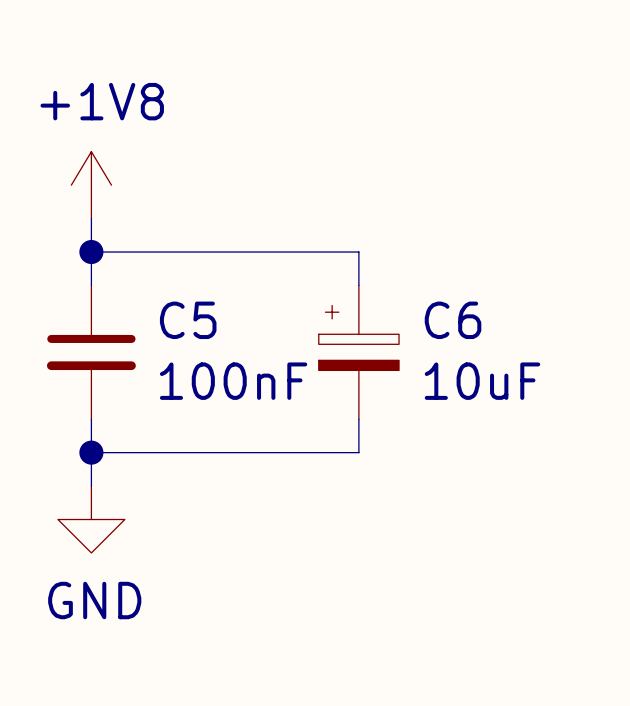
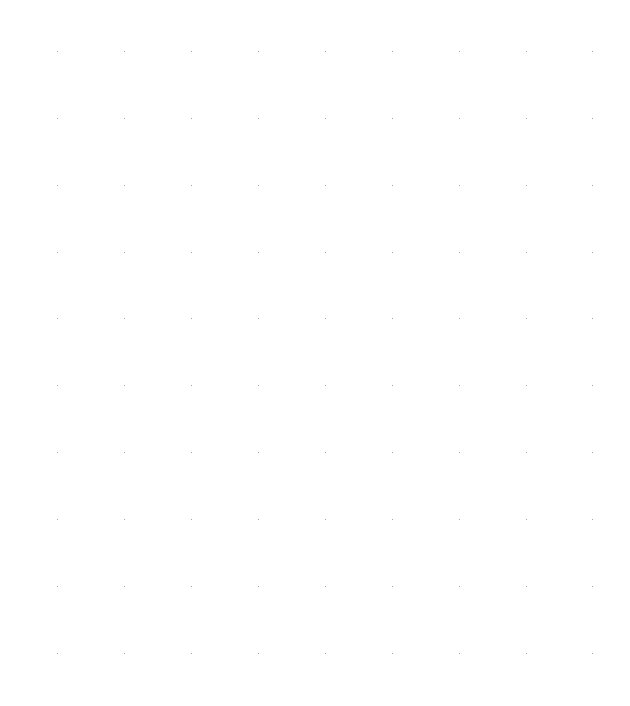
power symbol: +1V8 (91, 185) -> none
wire: (91, 218) (91, 285) -> none
wire: (91, 252) (358, 252) (358, 285) -> none
junction: (91, 252) -> none
C5: 100nF (91, 352) -> none
C6: 10uF (358, 352) -> none
wire: (91, 419) (91, 486) -> none
wire: (358, 419) (358, 452) (91, 452) -> none
junction: (91, 452) -> none
power symbol: GND (91, 519) -> none

